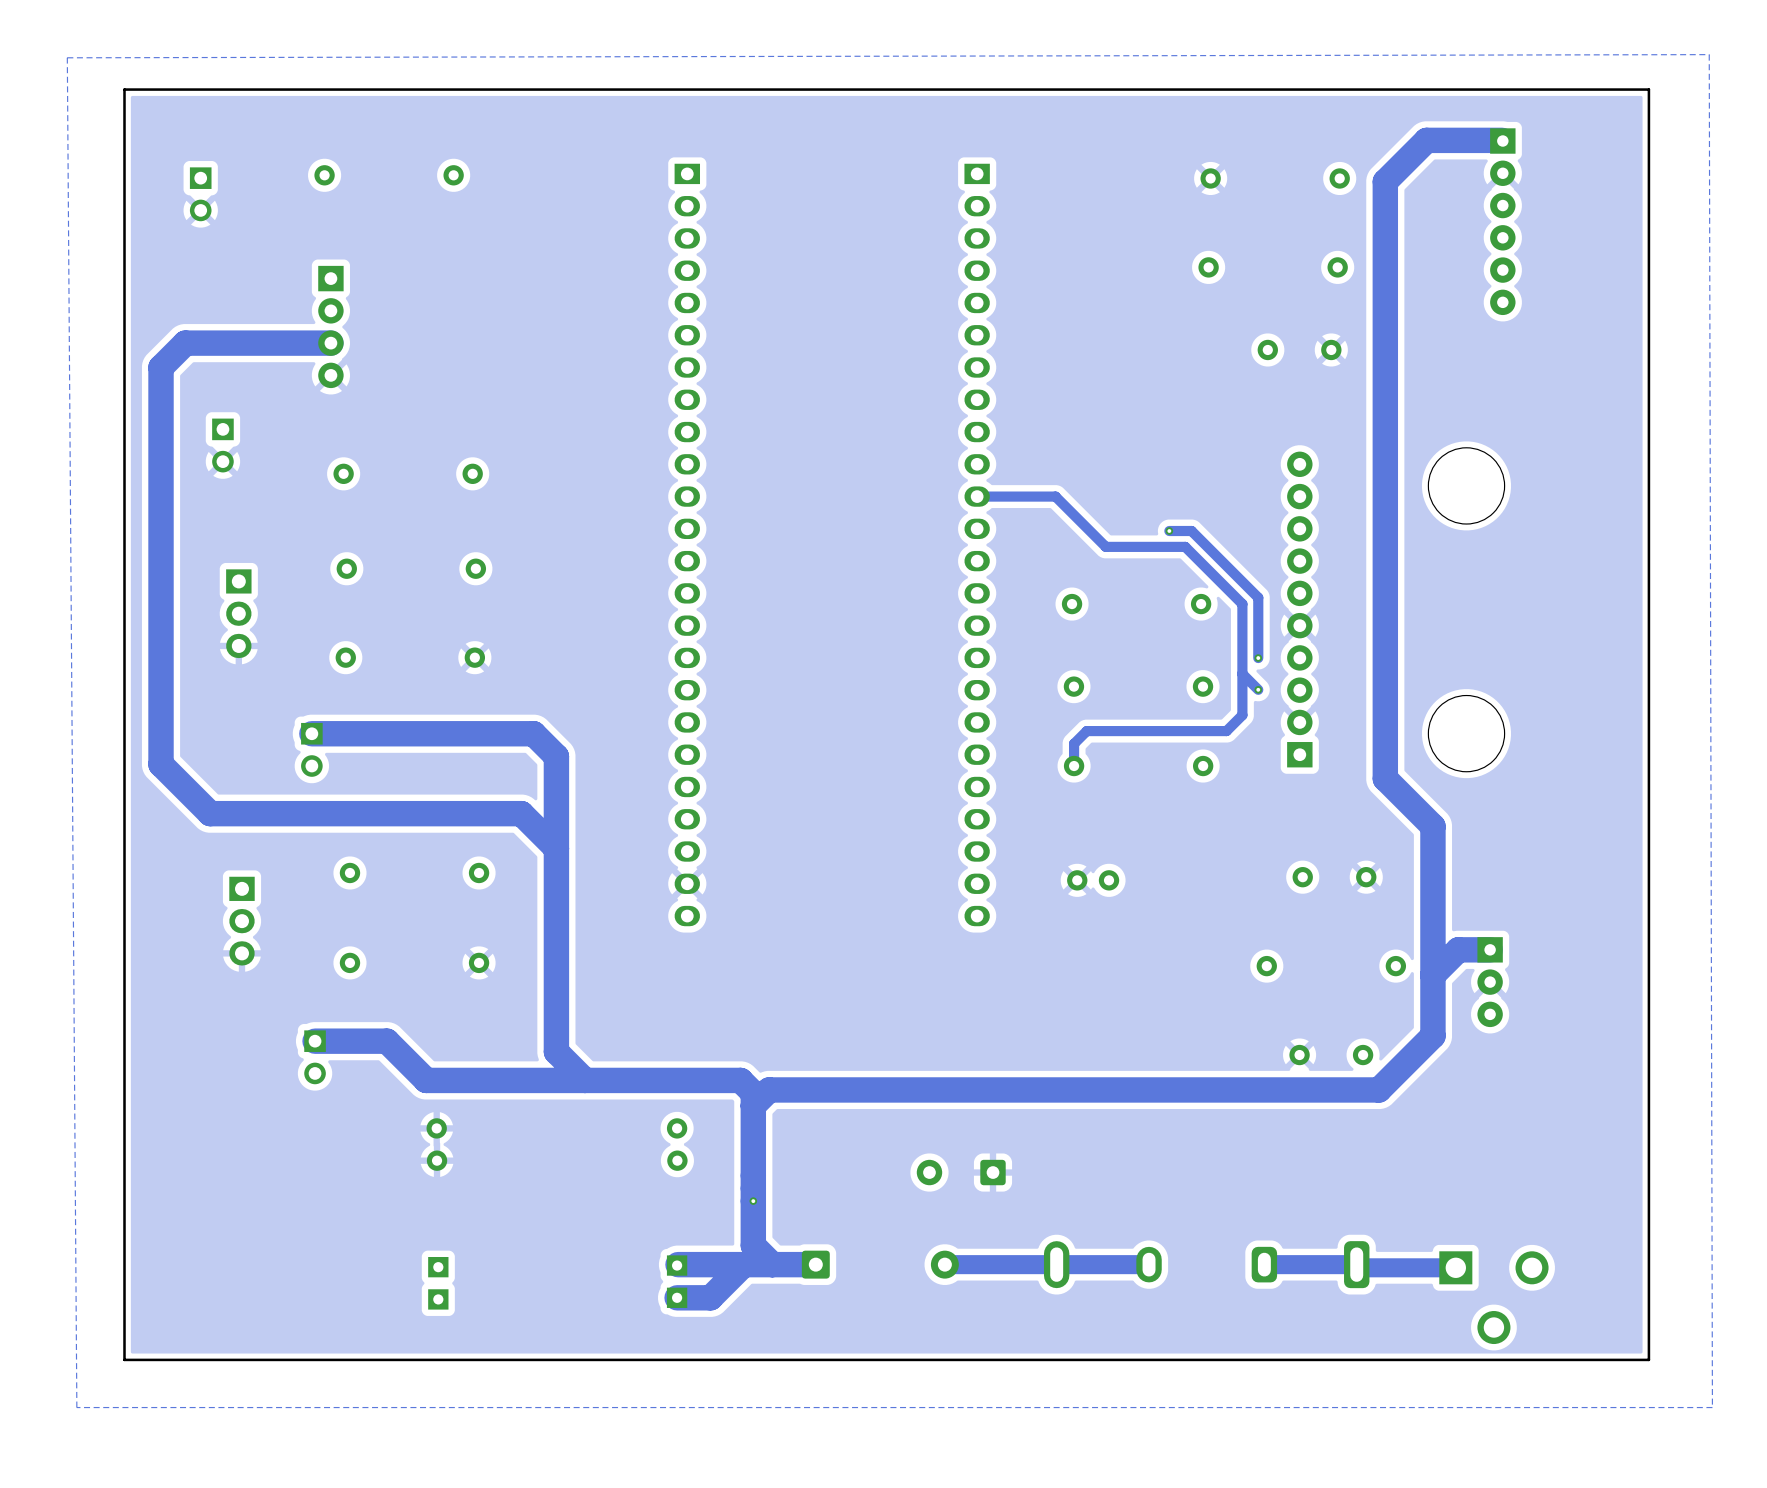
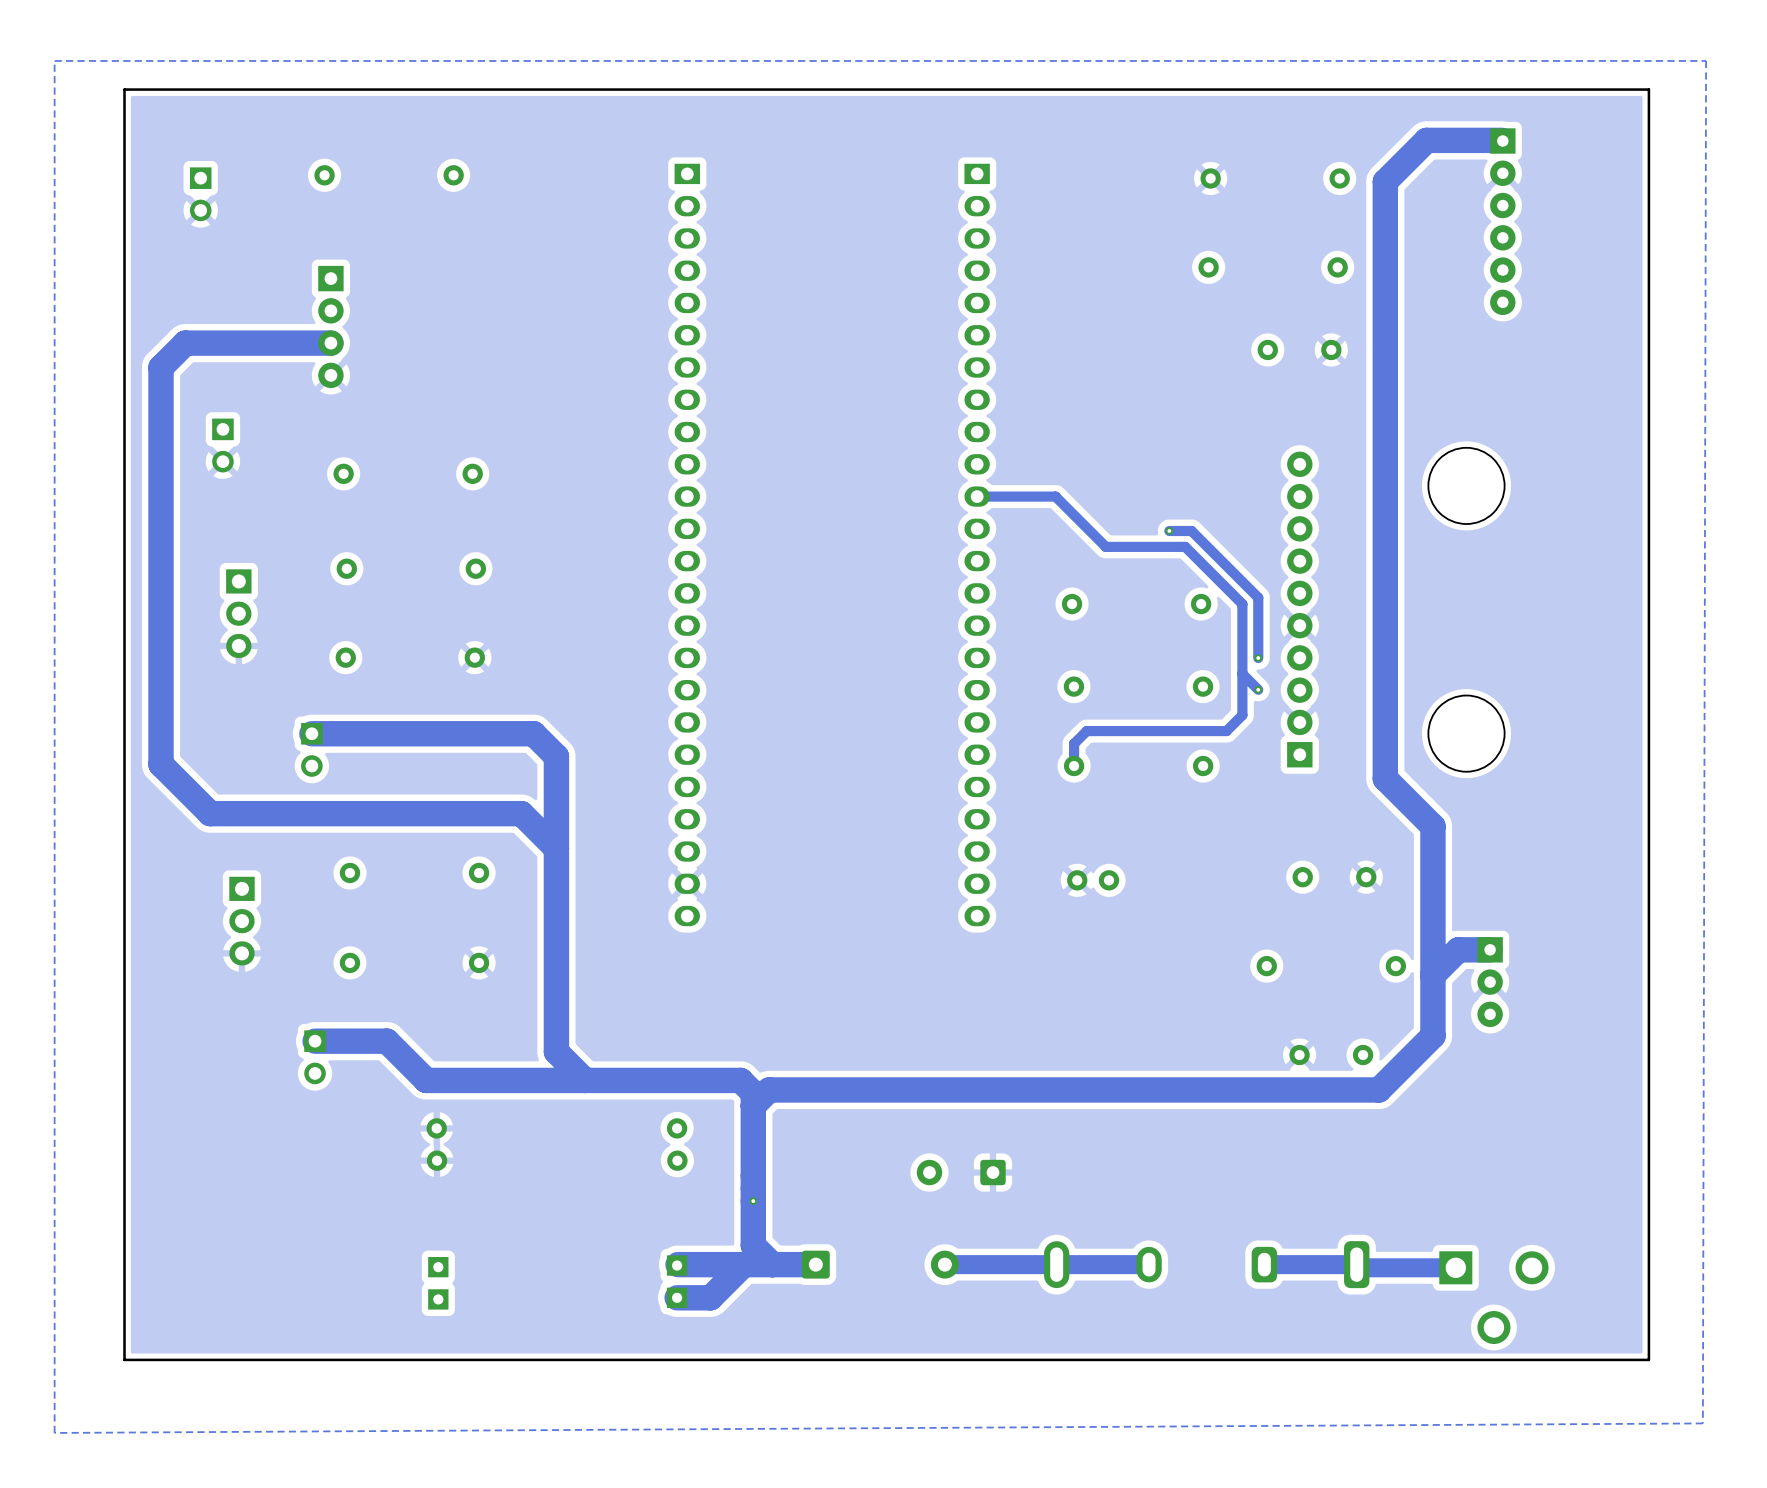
zone outline: (1709, 54) (1712, 1407) (76, 1407) (67, 57) (1709, 54) -> (1706, 60) (1702, 1423) (54, 1432) (54, 60) (1706, 60)

